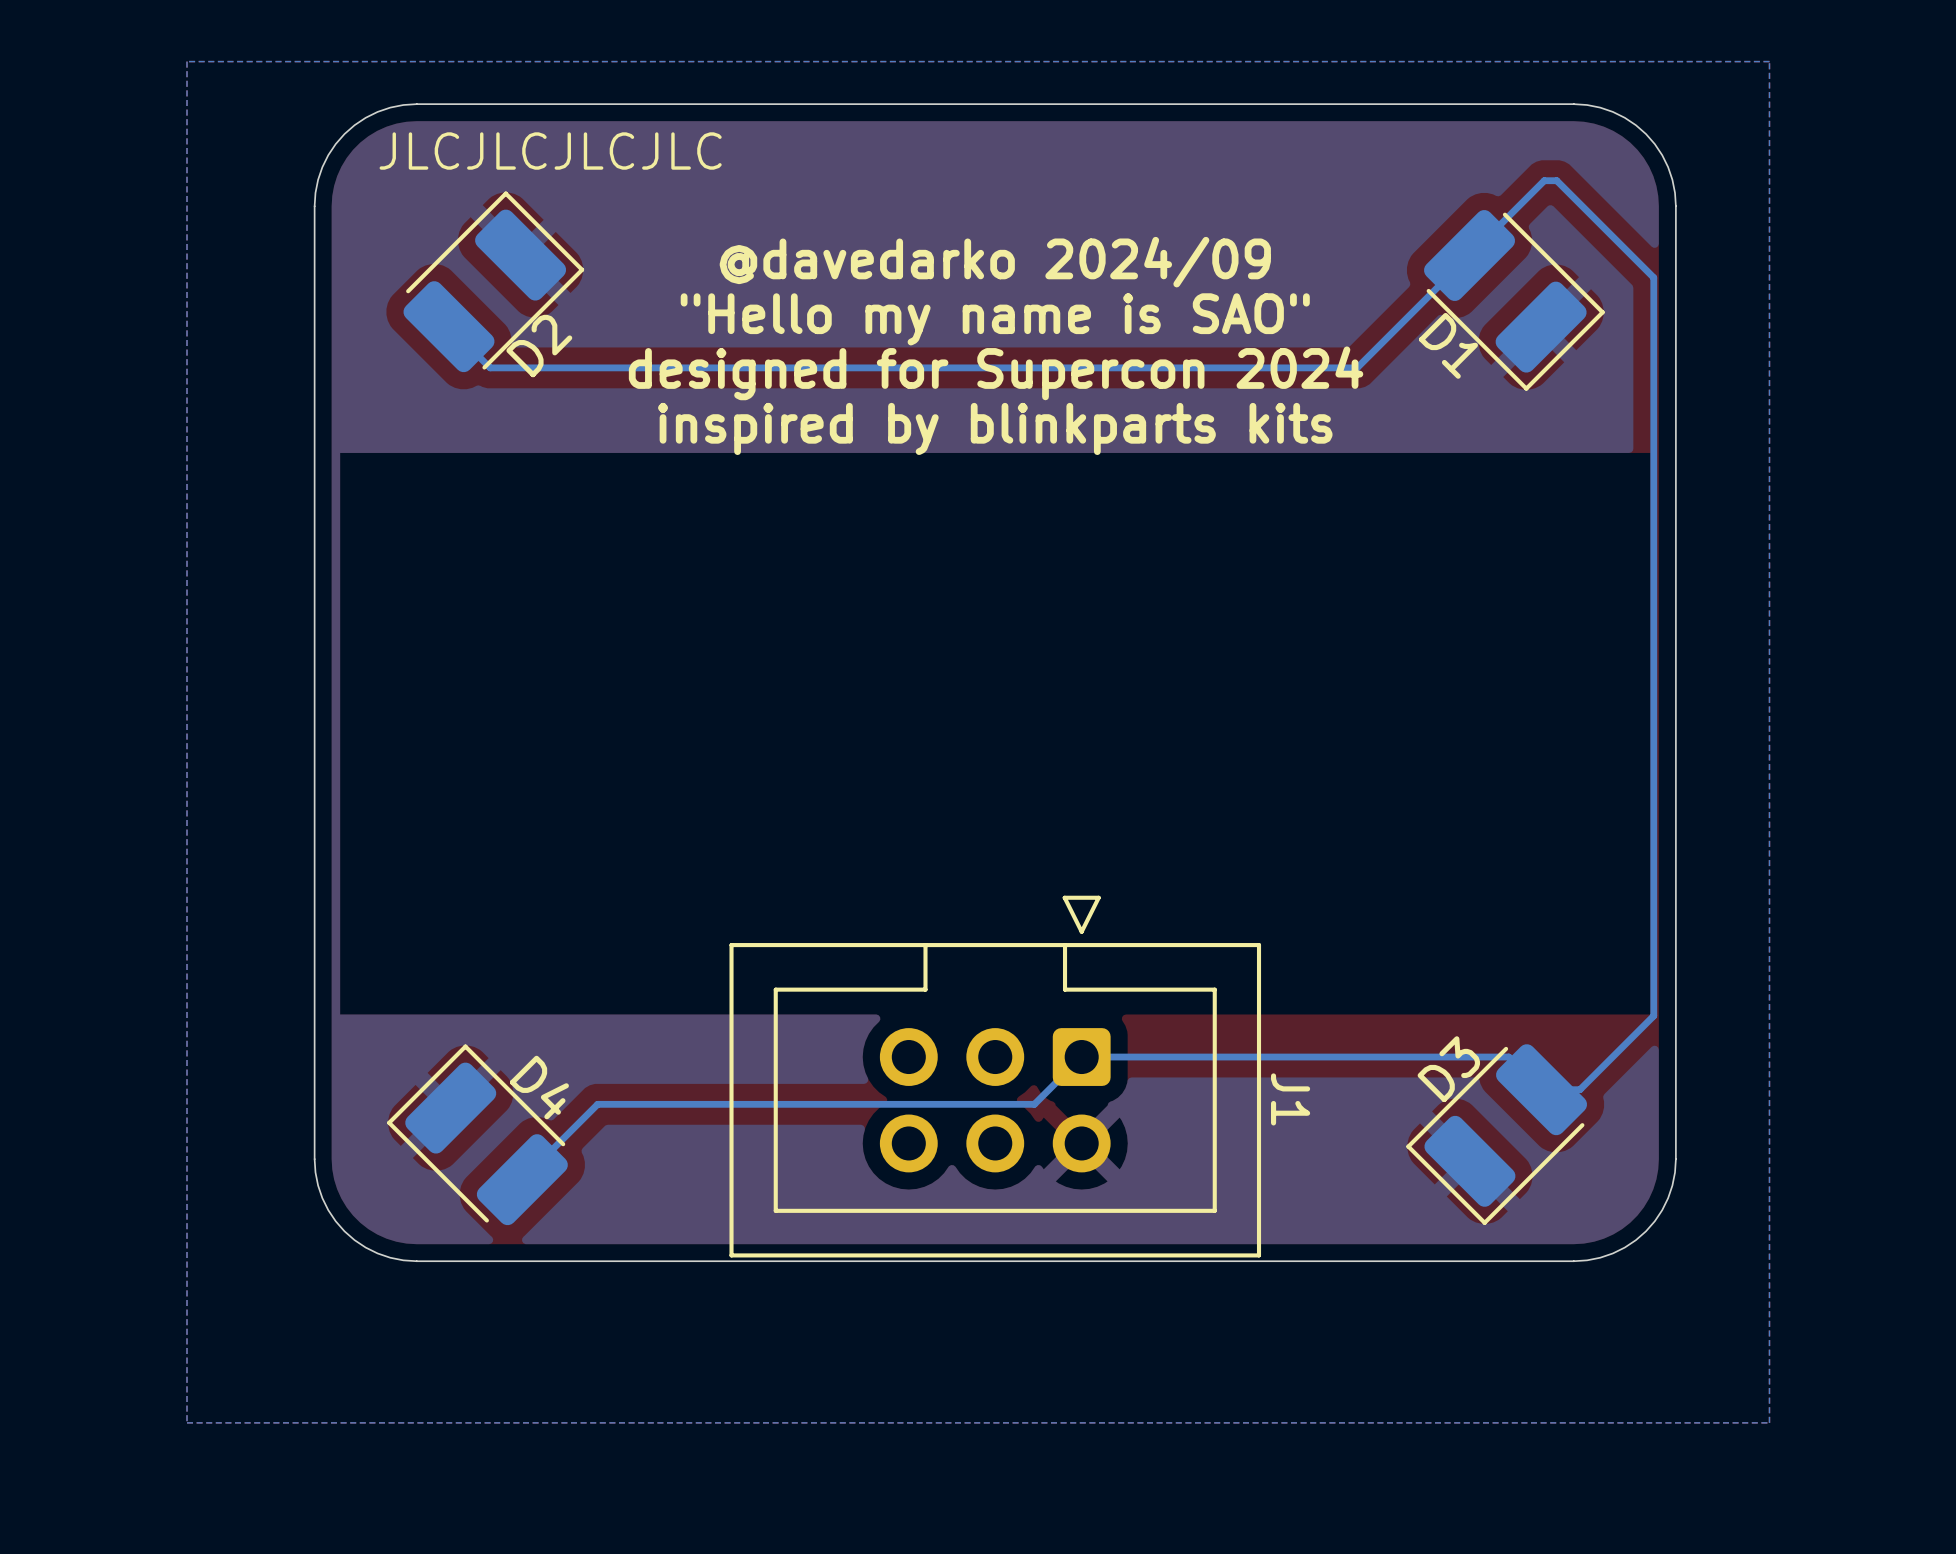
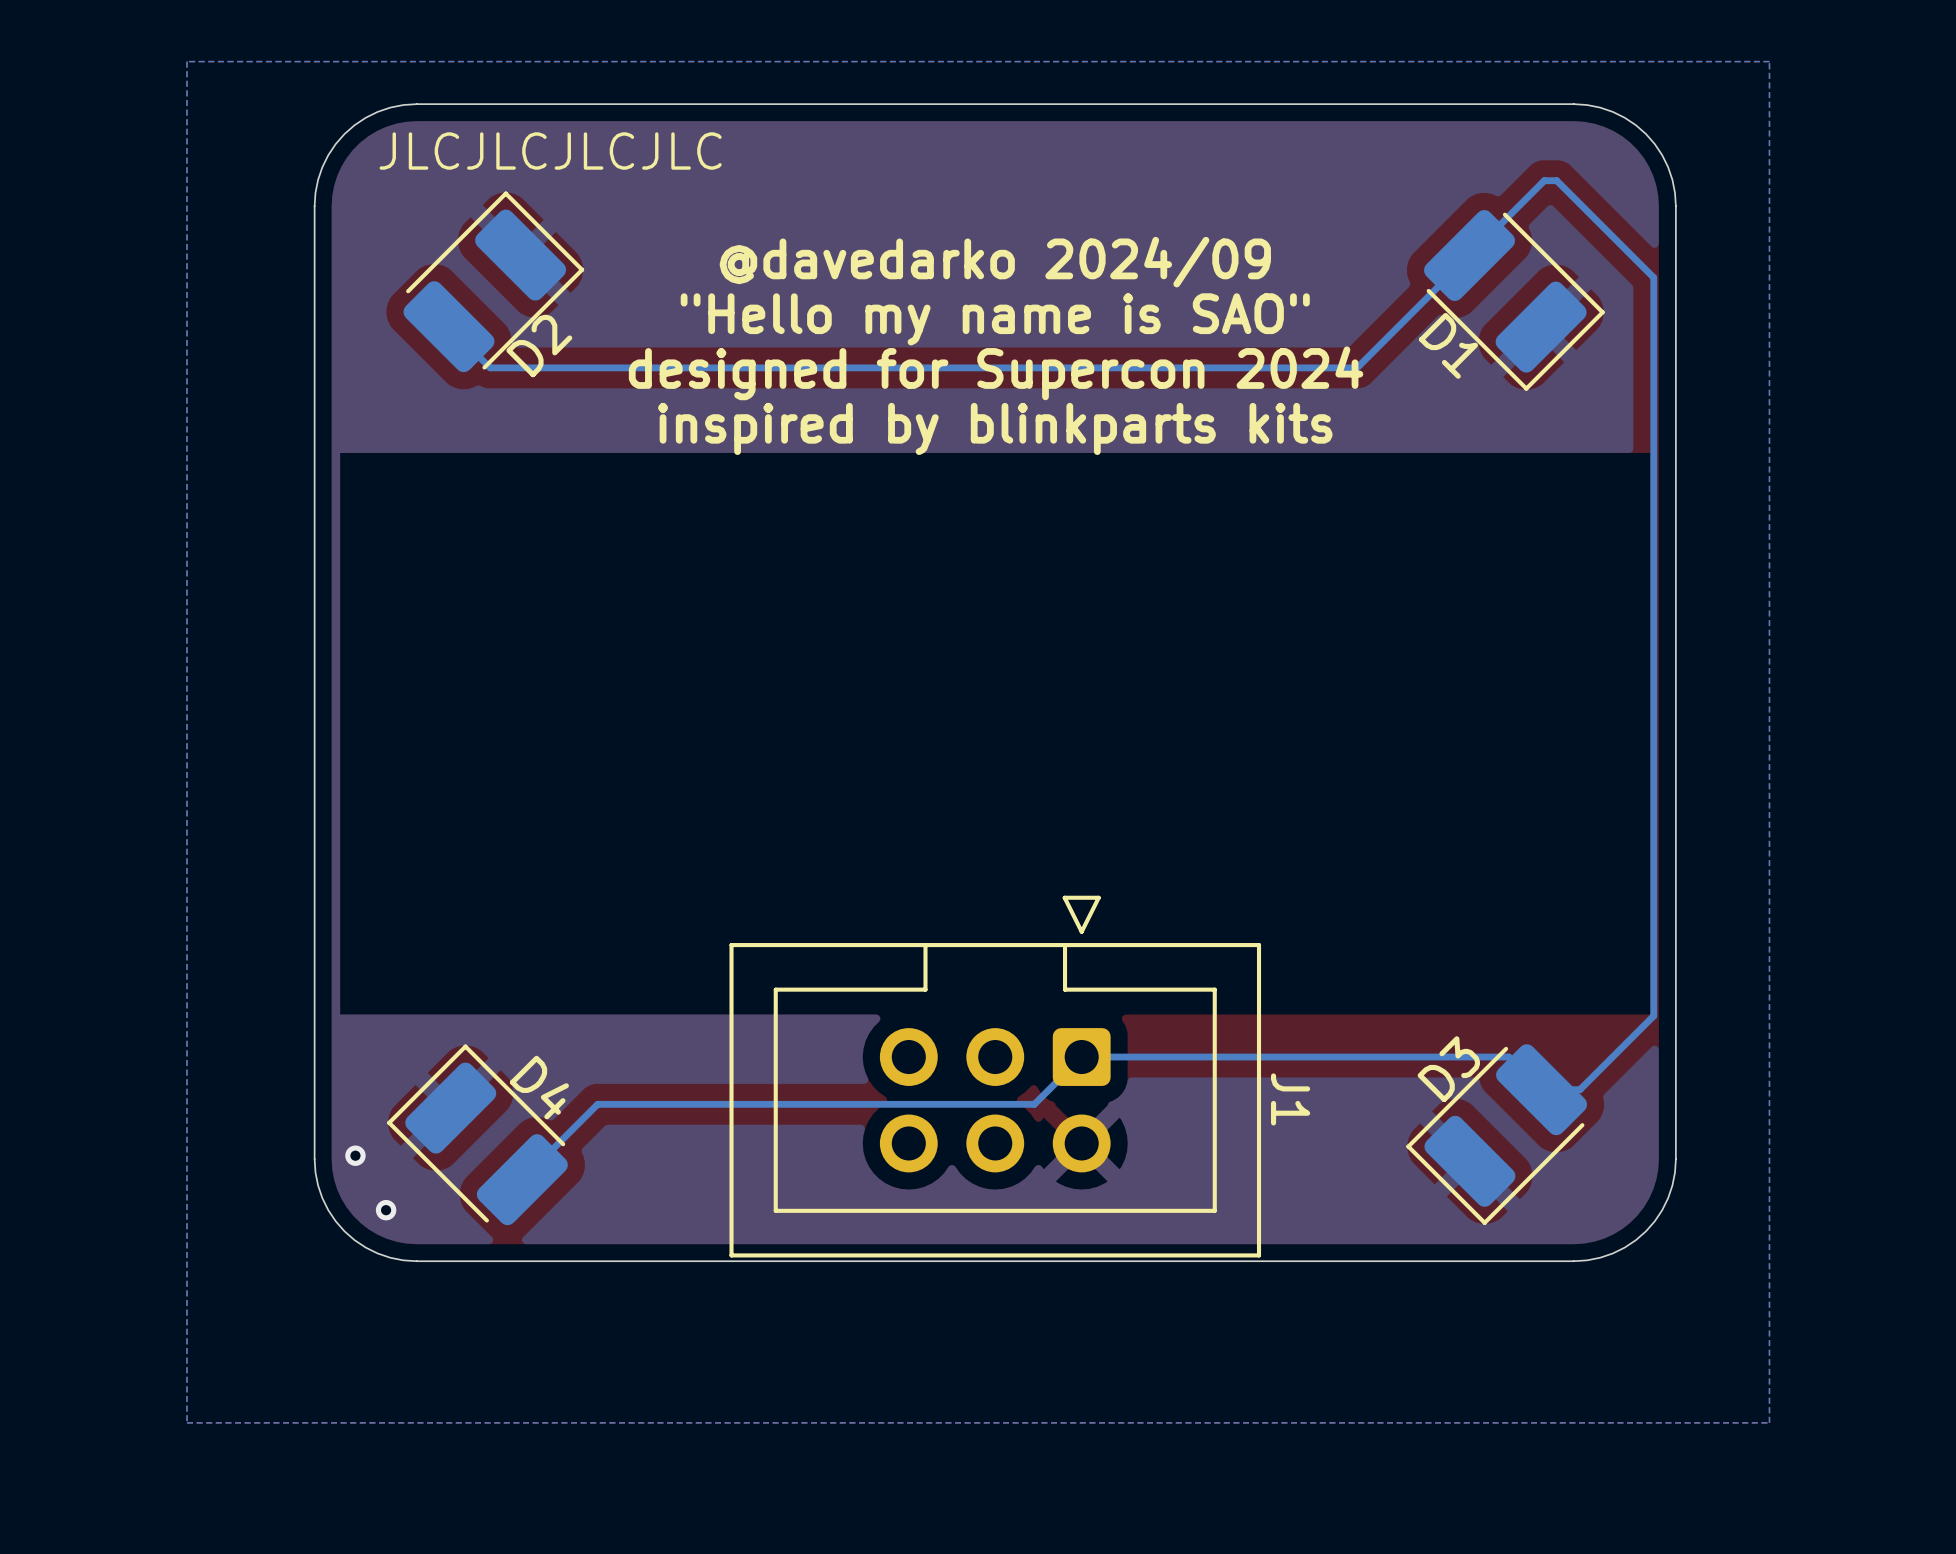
via: none -> (355, 1155)
via: none -> (386, 1210)

